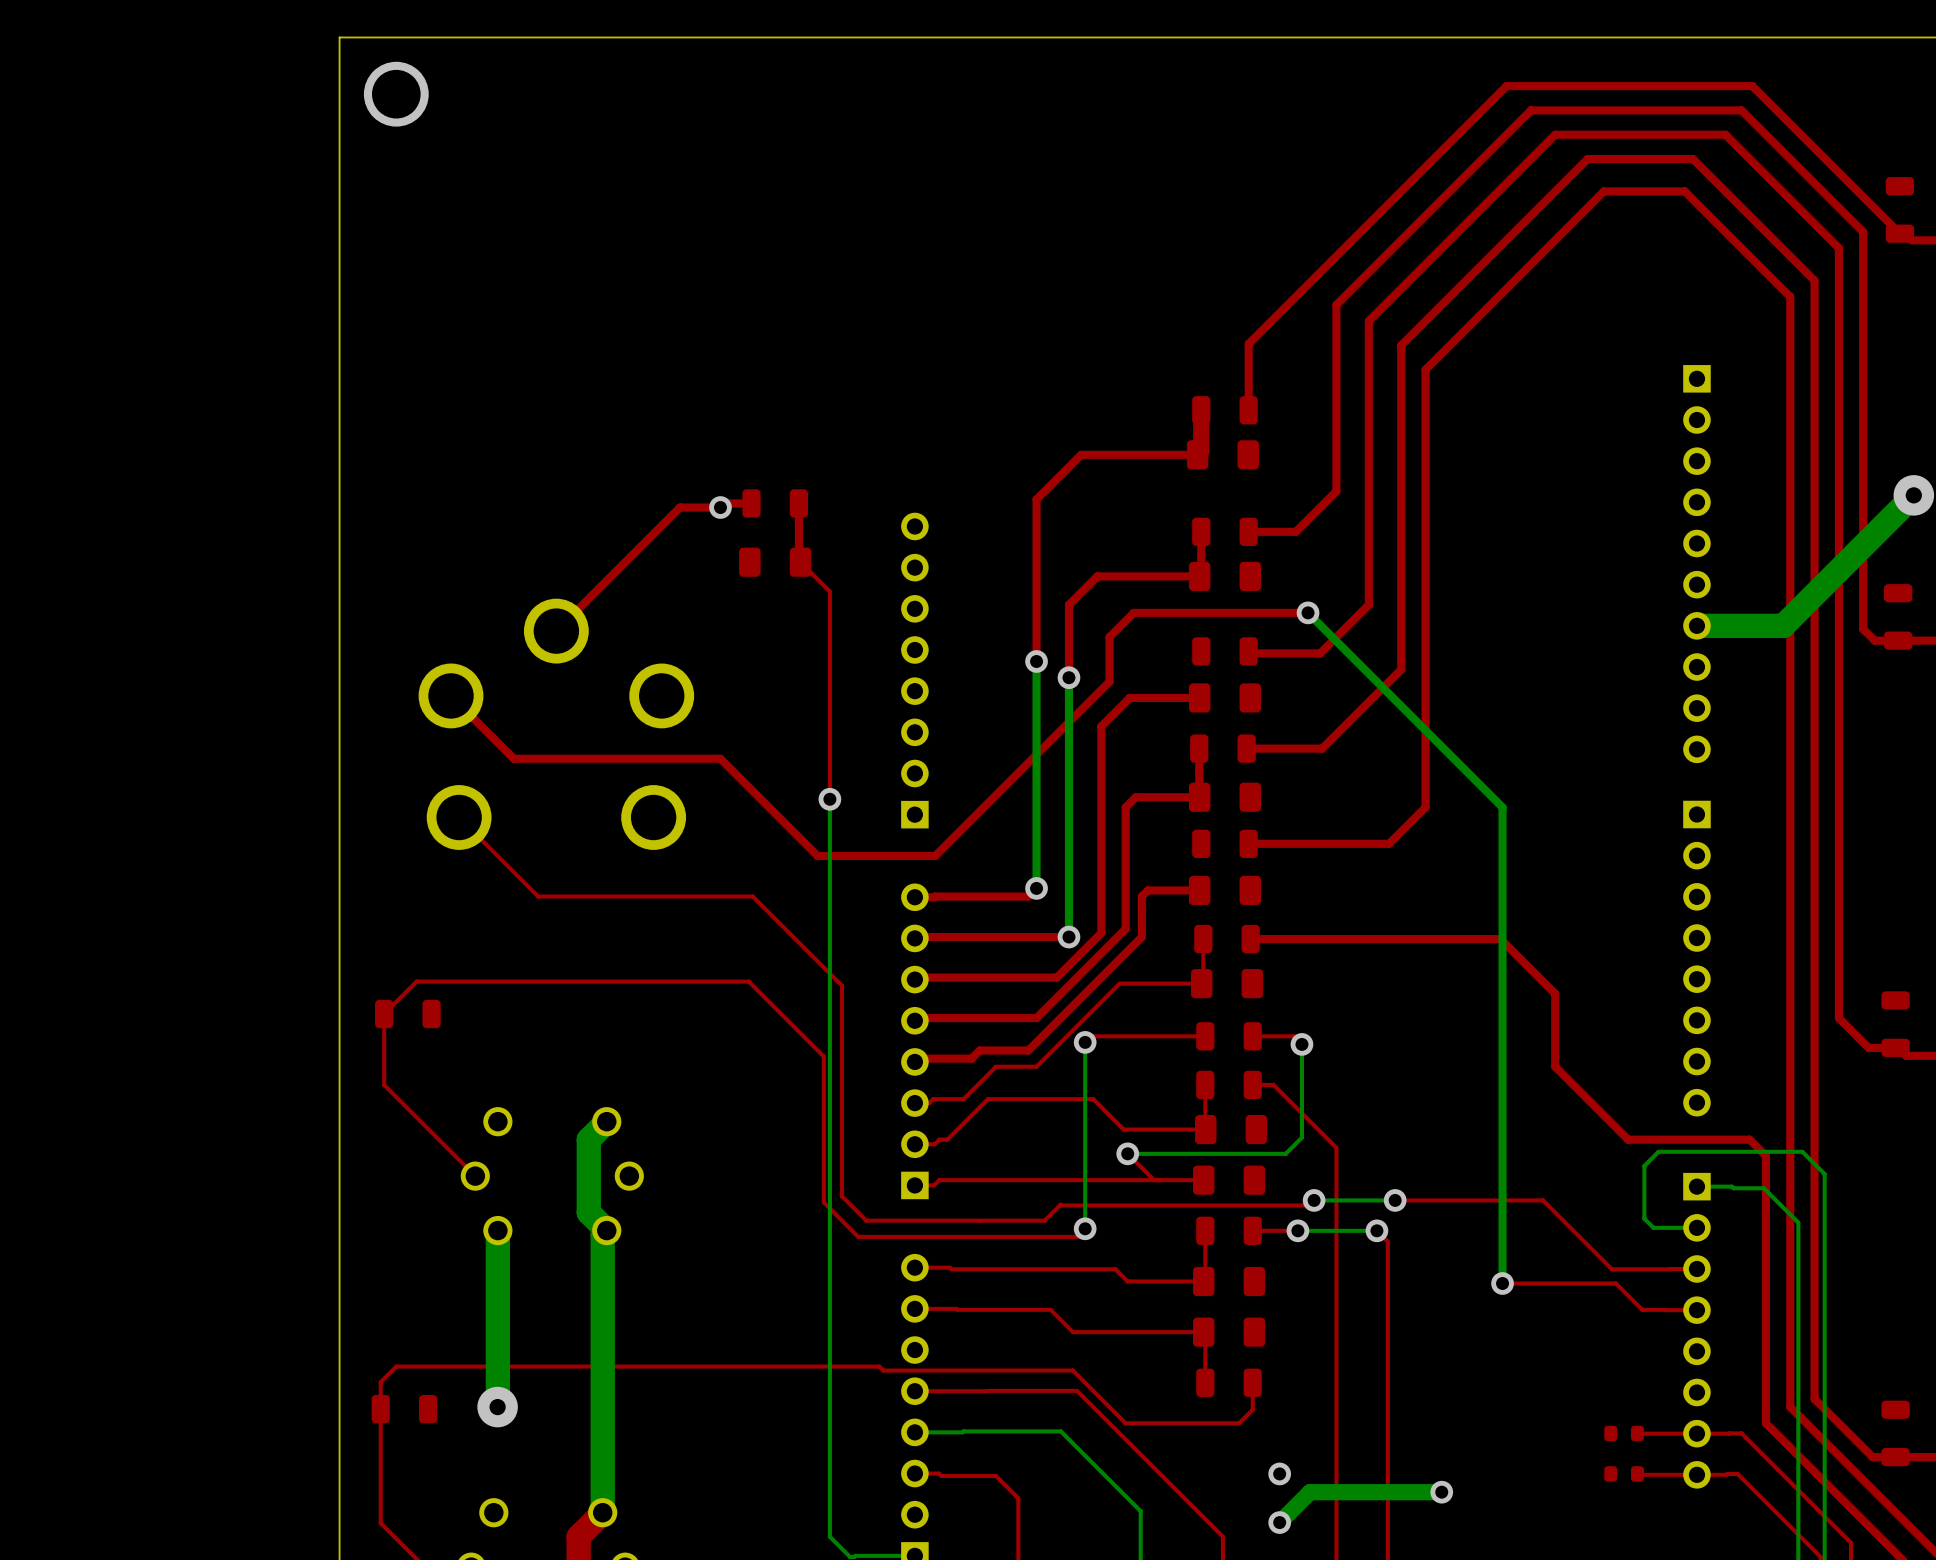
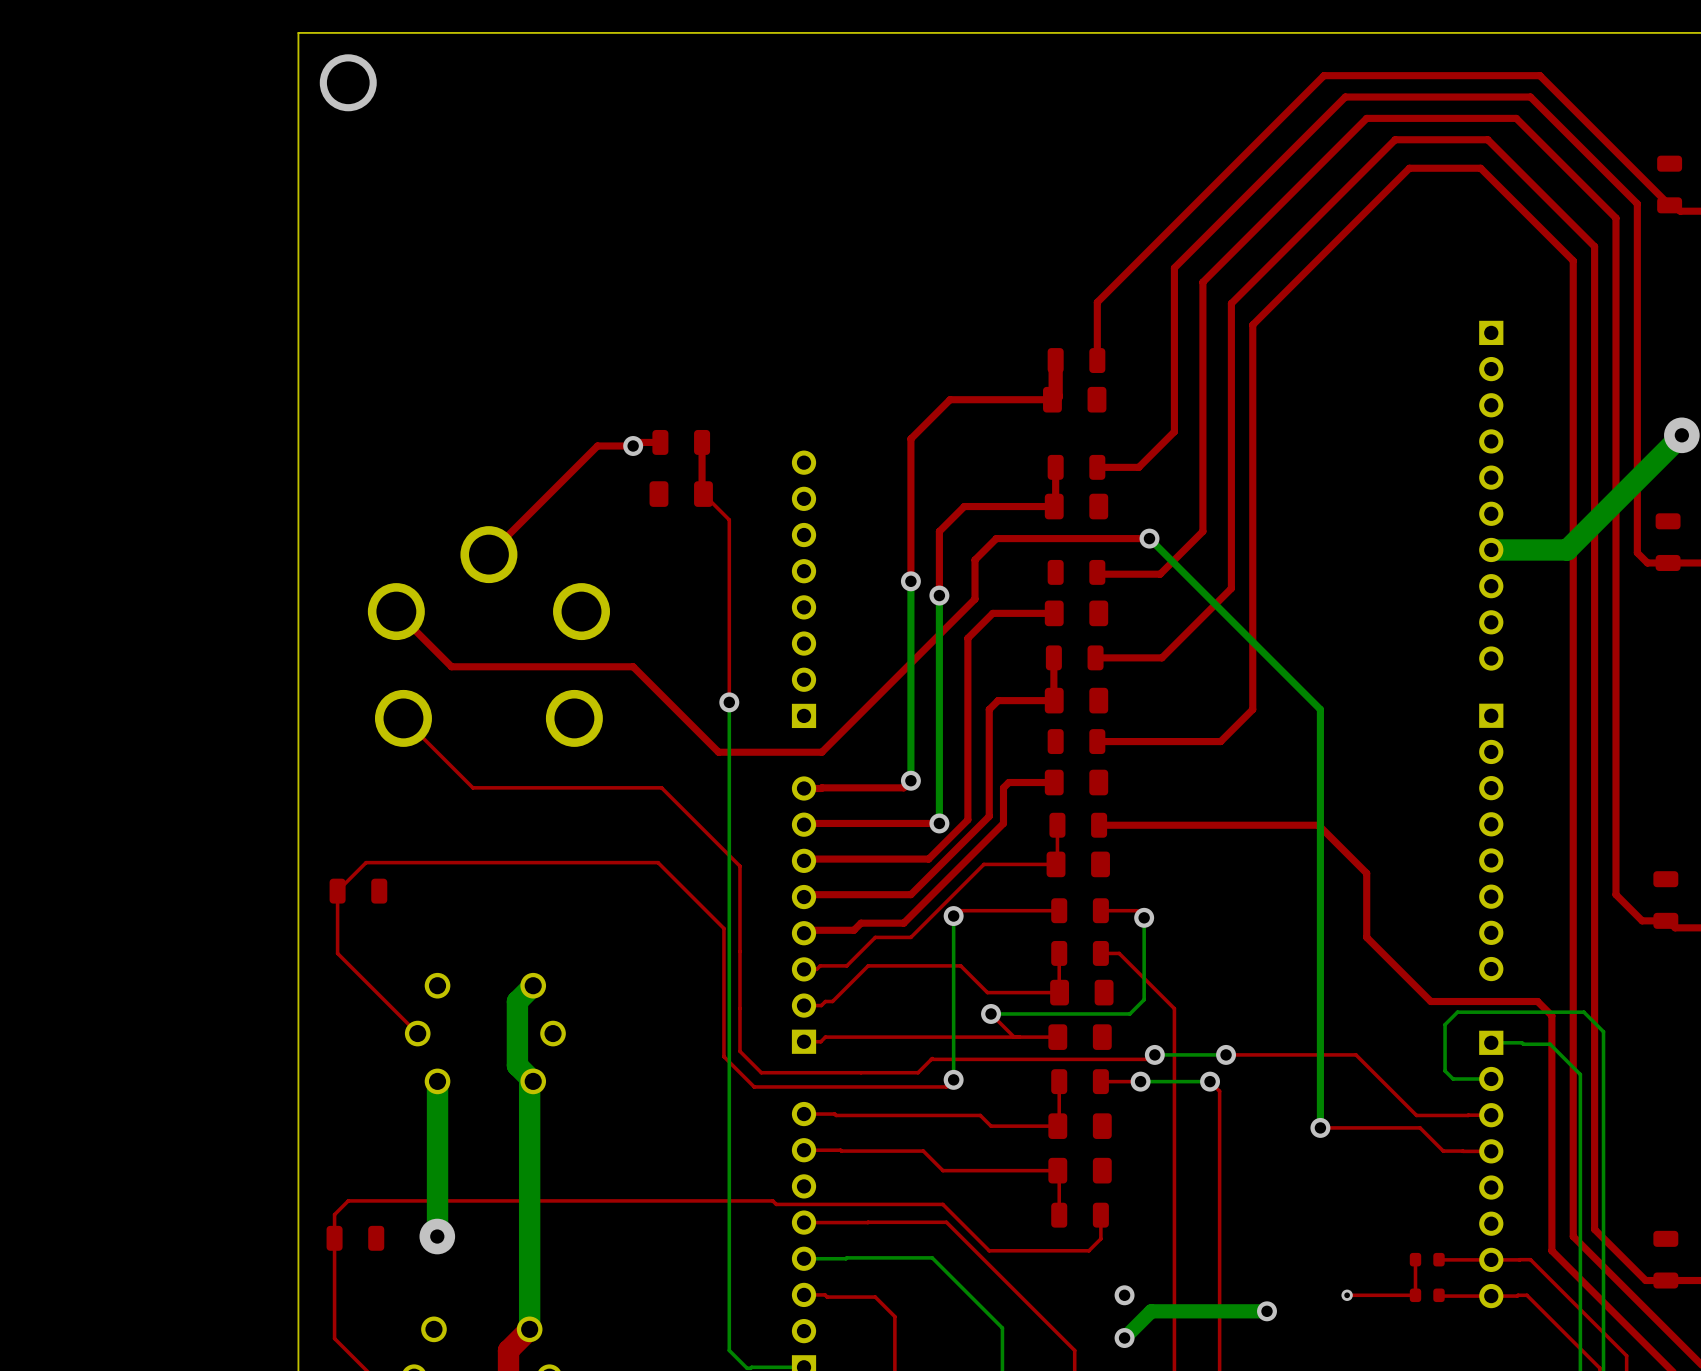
top track: none -> (1415, 1259) (1415, 1295) (1347, 1295)
via: none -> (1347, 1295)

